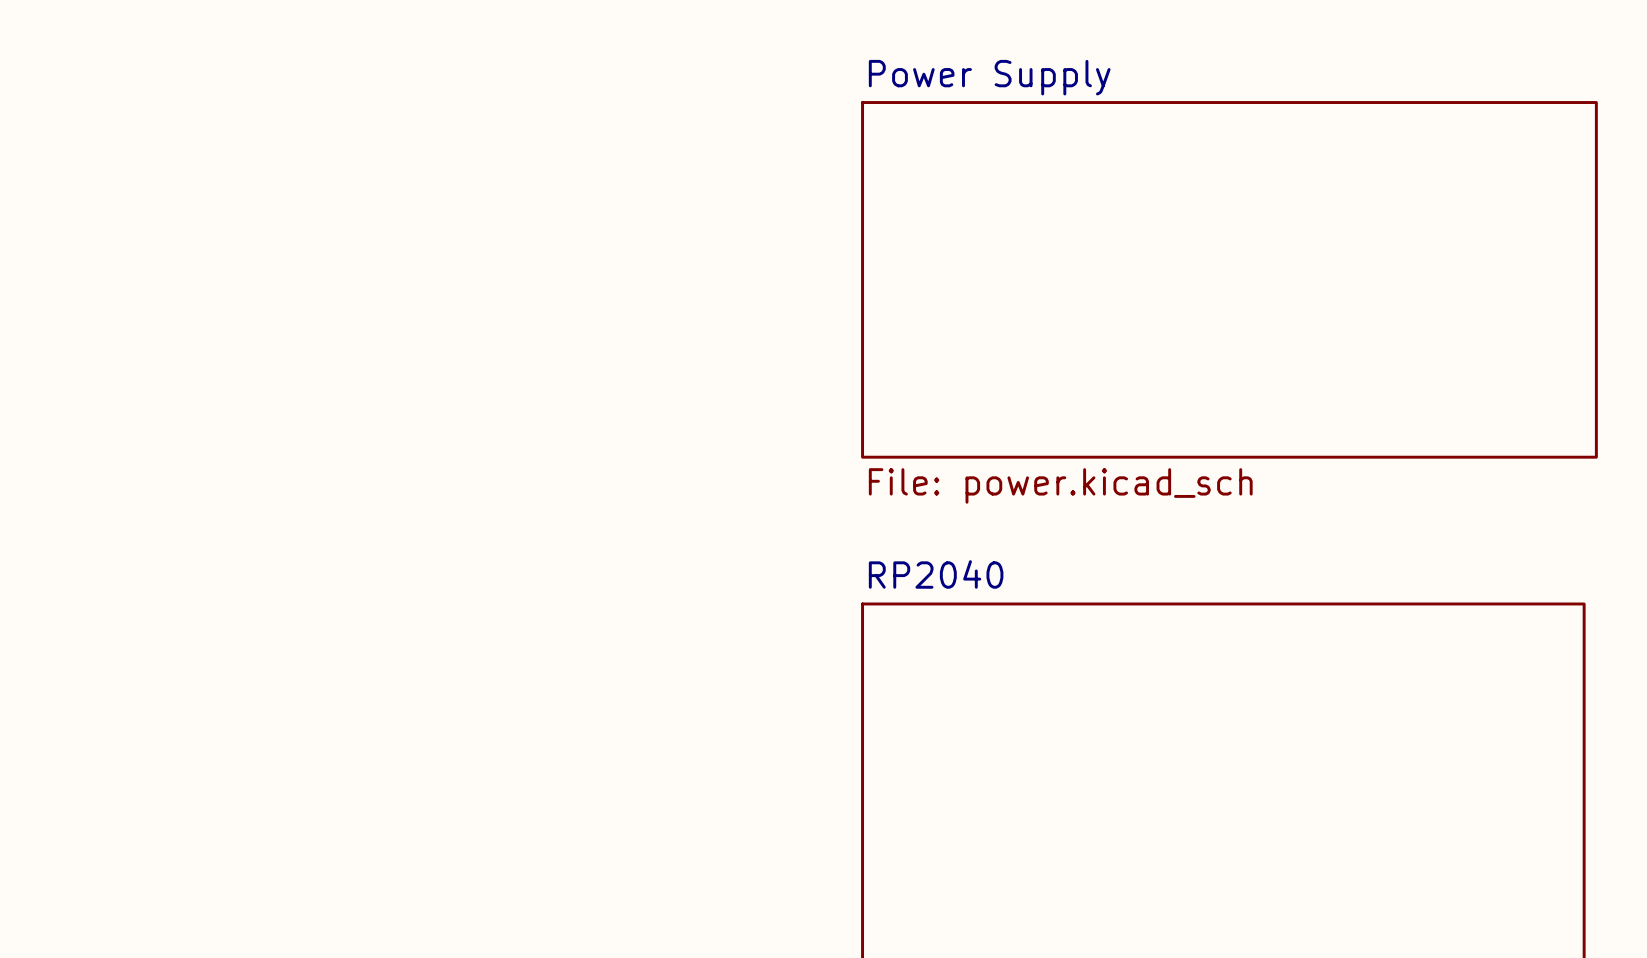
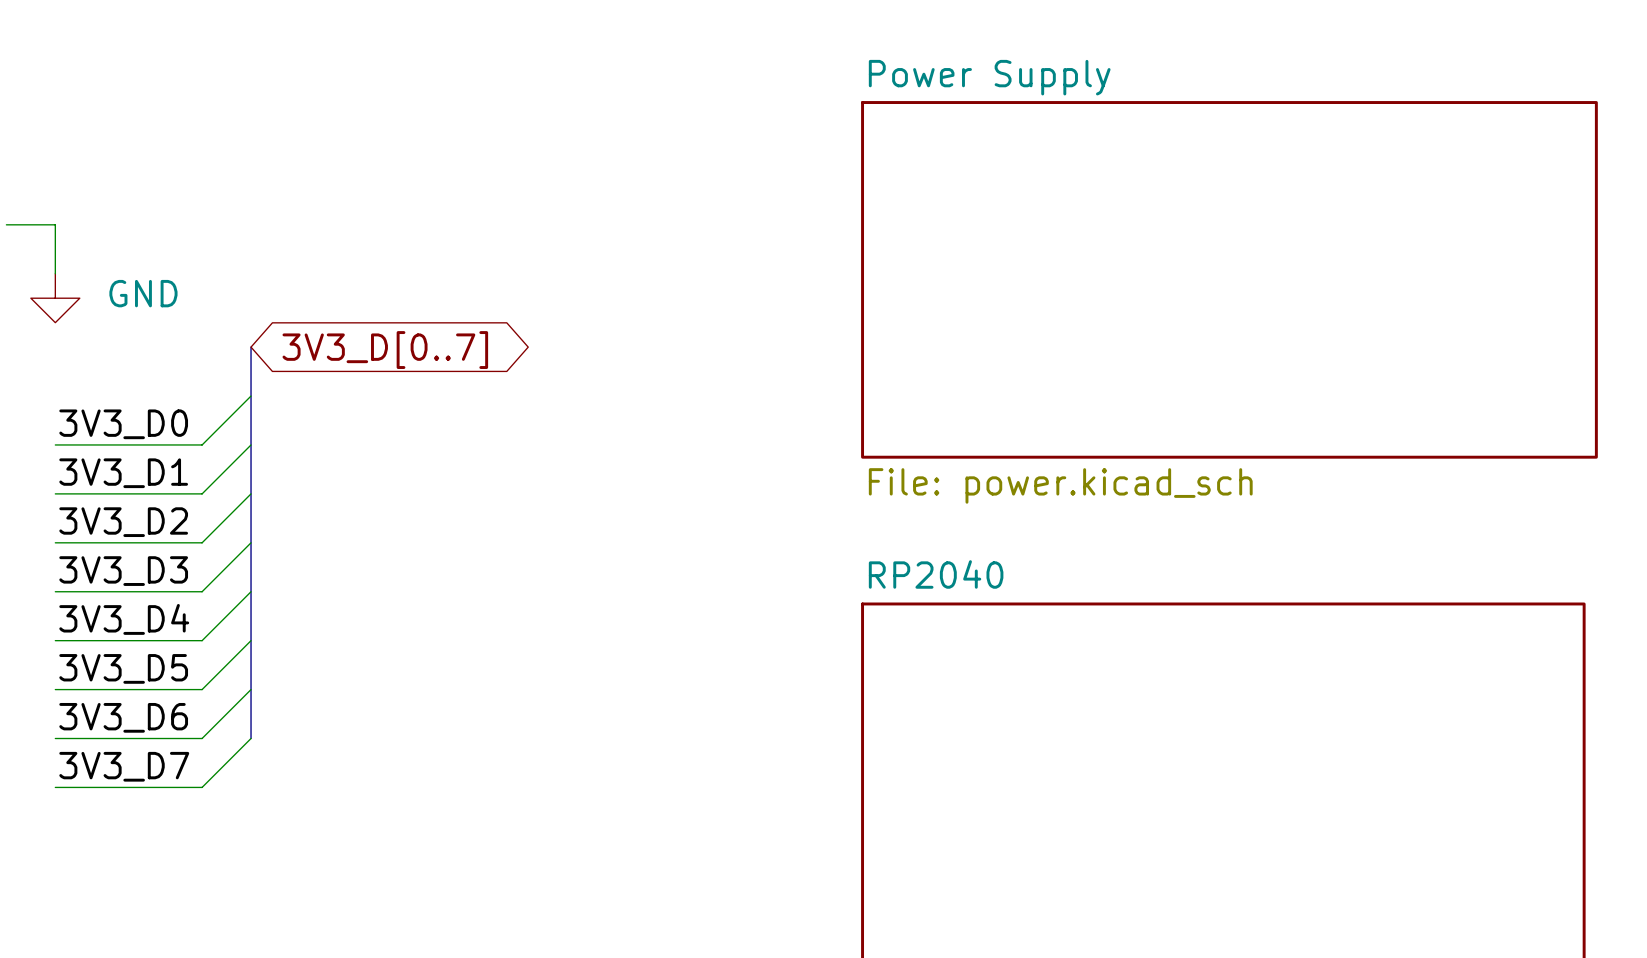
wire: none -> (6, 224) (55, 224) (55, 273)
power symbol: none -> GND (55, 298)
bus: none -> (251, 347) (251, 738)
global label: none -> 3V3_D[0..7] (385, 350)
wire: none -> (251, 396) (202, 444) (55, 444)
label: none -> 3V3_D0 (123, 424)
wire: none -> (251, 444) (202, 493) (55, 493)
label: none -> 3V3_D1 (123, 473)
wire: none -> (251, 493) (202, 542) (55, 542)
label: none -> 3V3_D2 (123, 522)
wire: none -> (251, 542) (202, 591) (55, 591)
label: none -> 3V3_D3 (123, 571)
wire: none -> (251, 591) (202, 640) (55, 640)
label: none -> 3V3_D4 (124, 619)
wire: none -> (251, 640) (202, 689) (55, 689)
label: none -> 3V3_D5 (123, 668)
wire: none -> (251, 689) (202, 738) (55, 738)
label: none -> 3V3_D6 (123, 717)
wire: none -> (251, 738) (202, 787) (55, 787)
label: none -> 3V3_D7 (124, 766)

